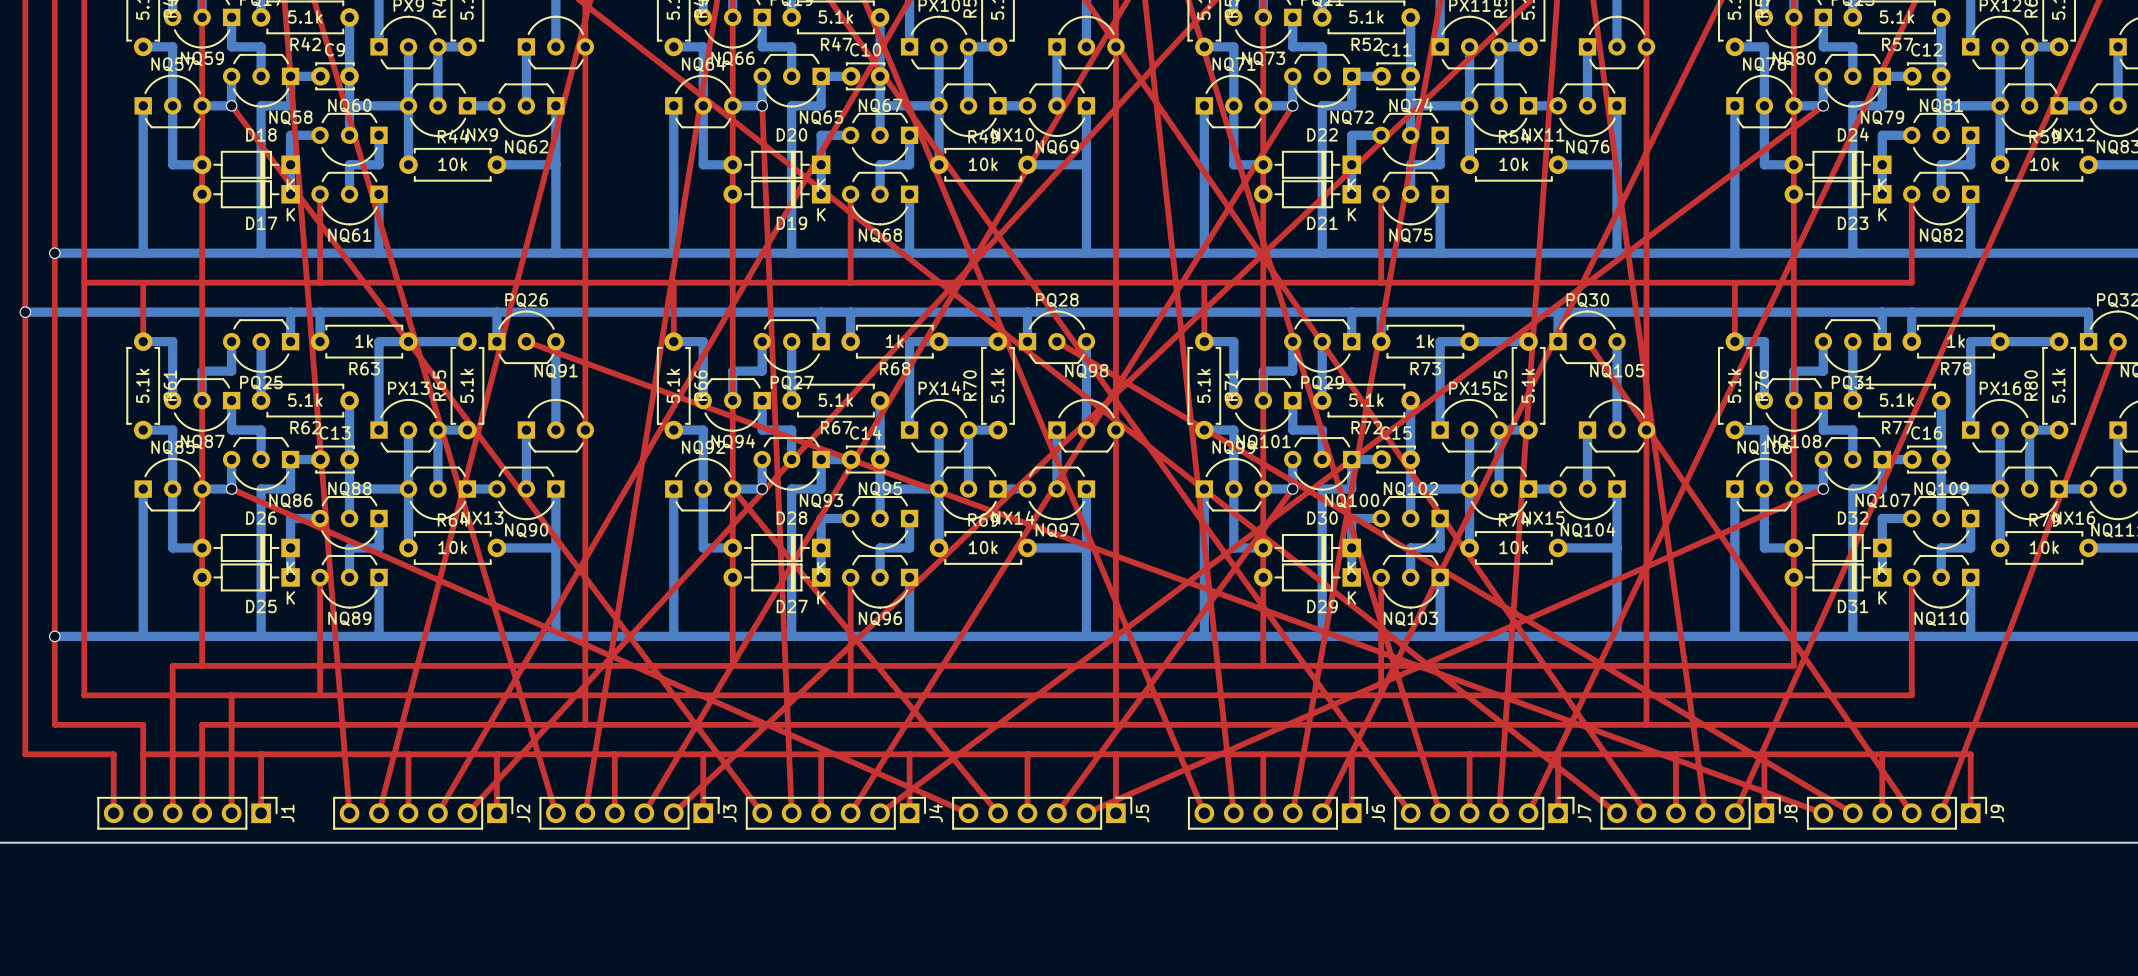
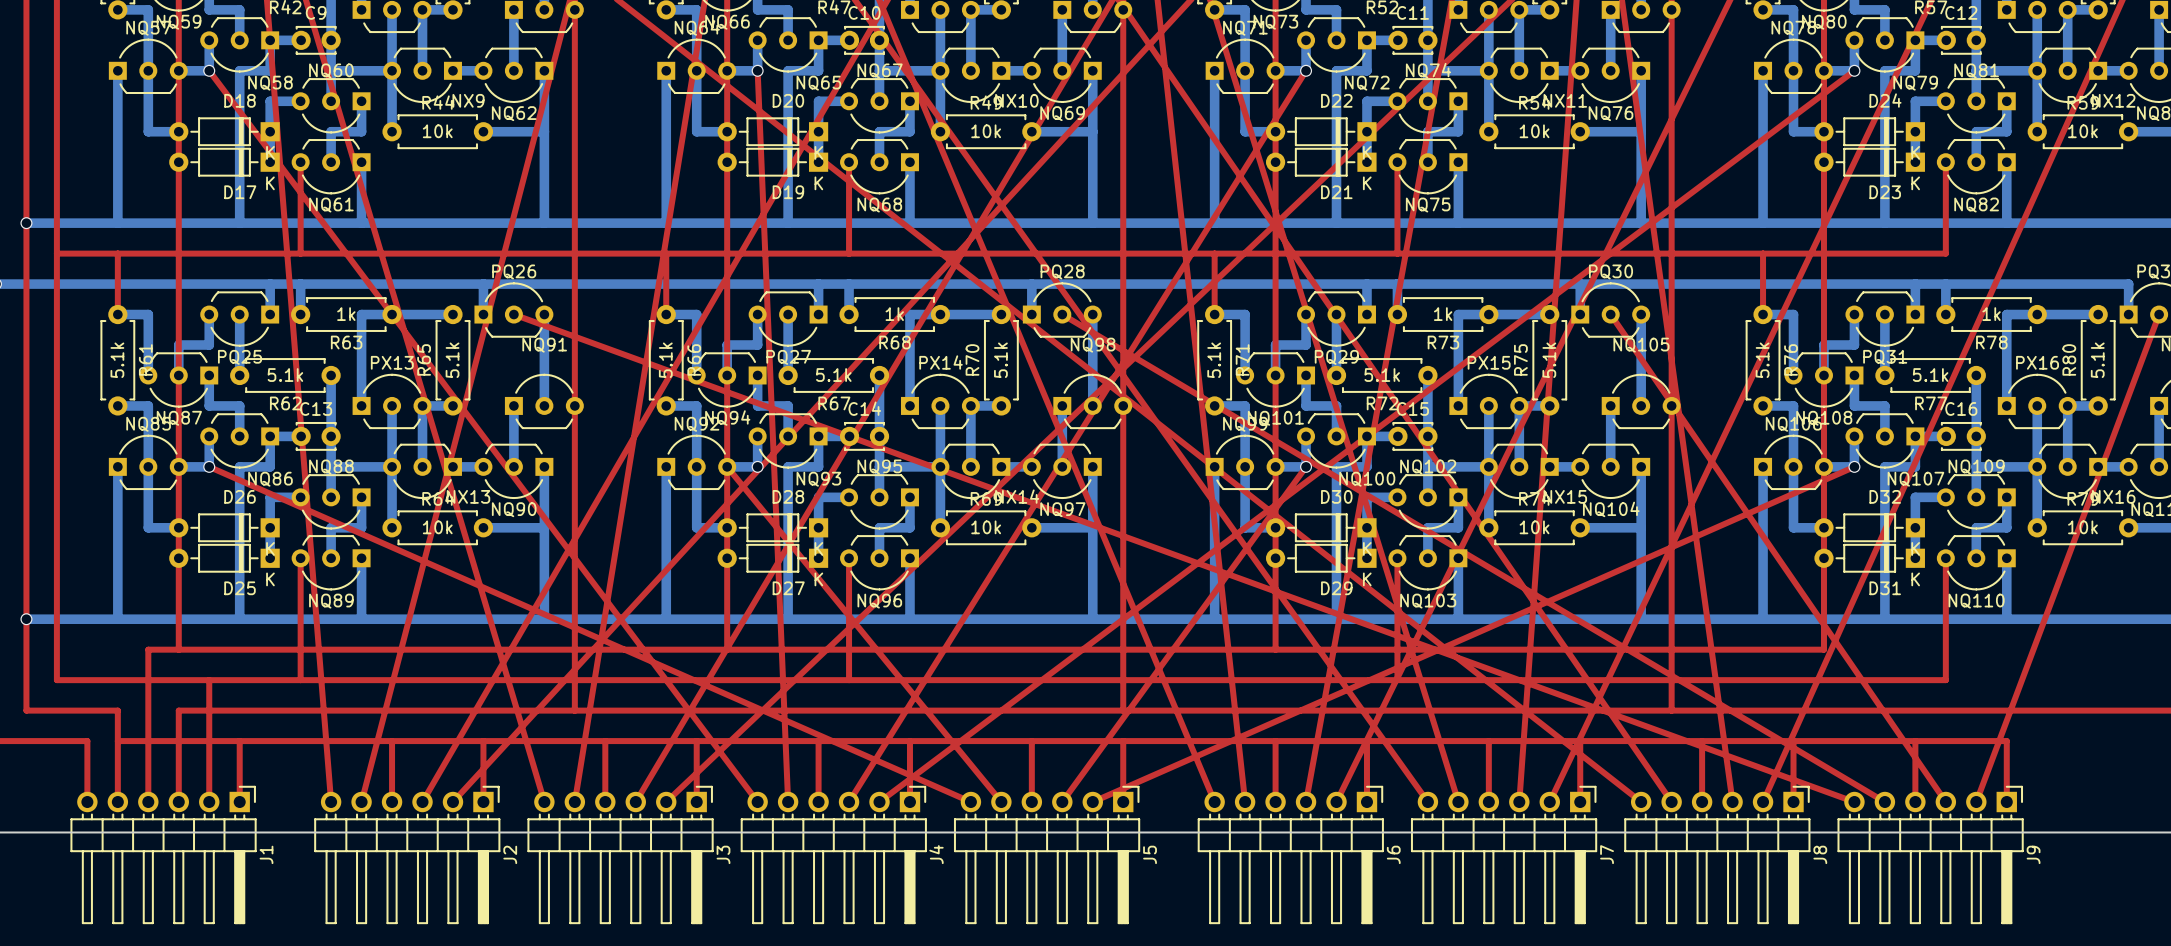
J1 footprint: [97, 797, 278, 830] -> [70, 786, 257, 924]
J2 footprint: [333, 797, 514, 830] -> [314, 786, 501, 924]
J3 footprint: [539, 797, 720, 830] -> [527, 786, 714, 924]
J4 footprint: [746, 797, 926, 830] -> [740, 786, 927, 924]
J5 footprint: [952, 797, 1133, 830] -> [954, 786, 1140, 924]
J6 footprint: [1188, 797, 1368, 830] -> [1197, 786, 1384, 924]
J7 footprint: [1394, 797, 1575, 830] -> [1411, 786, 1597, 924]
J8 footprint: [1600, 797, 1781, 830] -> [1624, 786, 1811, 924]
J9 footprint: [1807, 797, 1987, 830] -> [1837, 786, 2024, 924]

